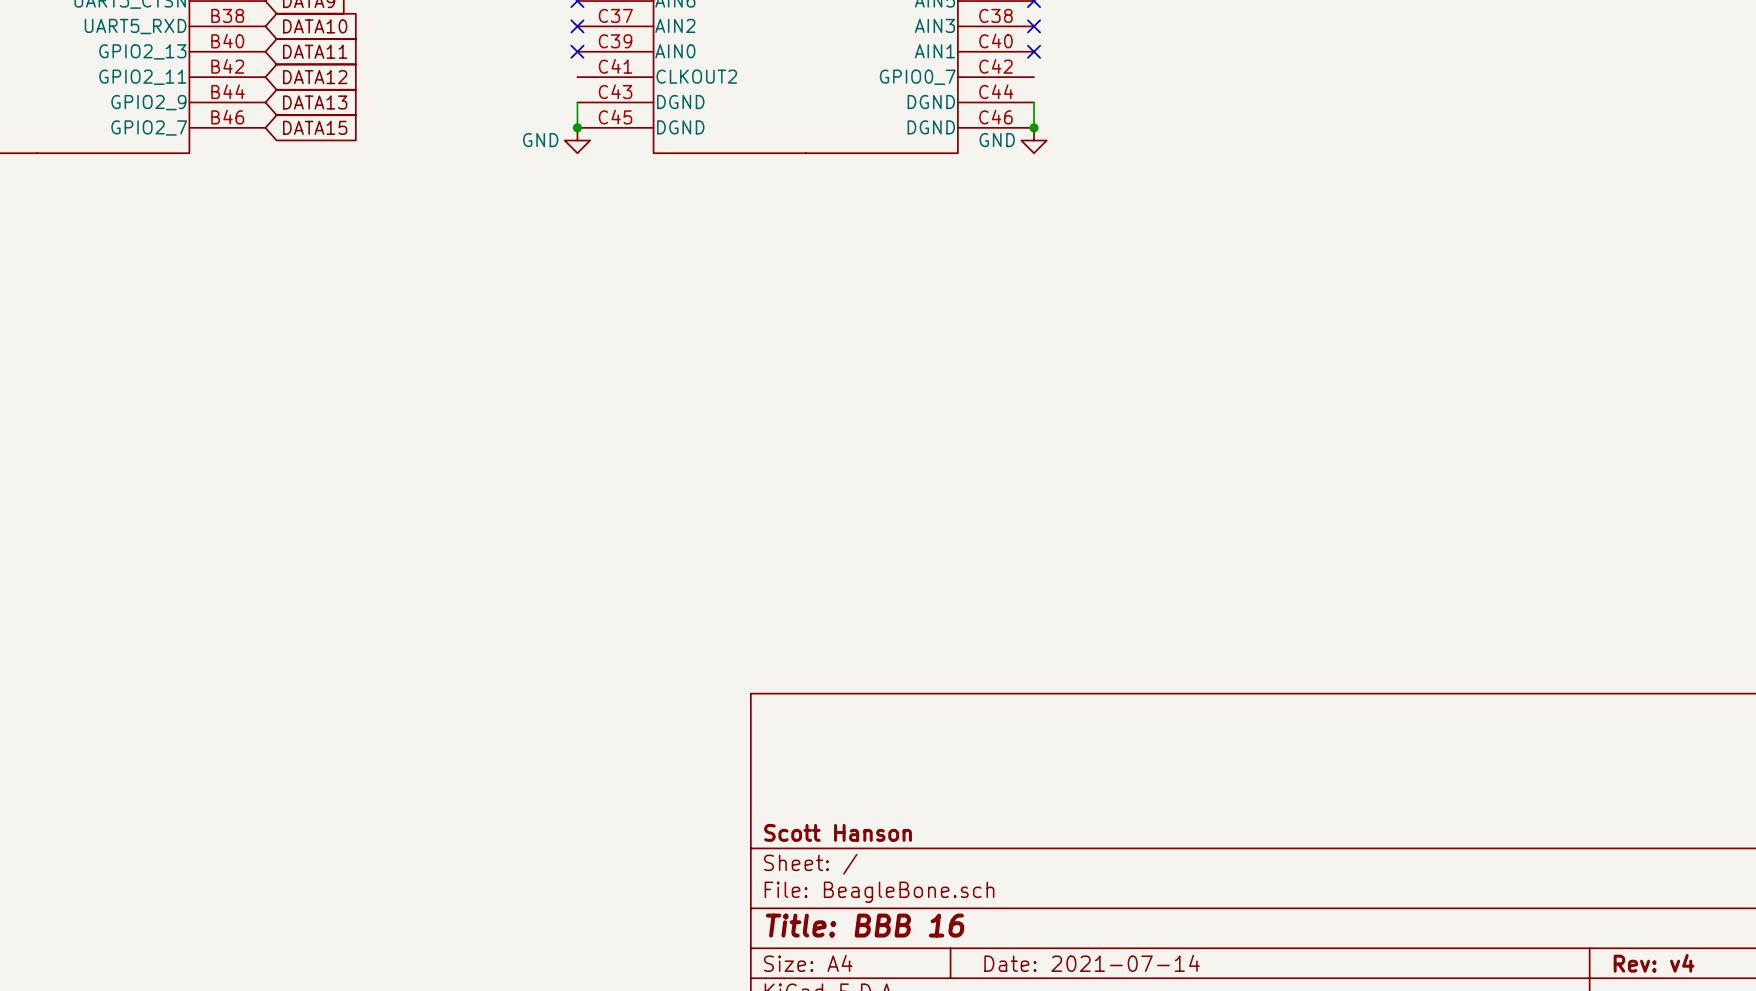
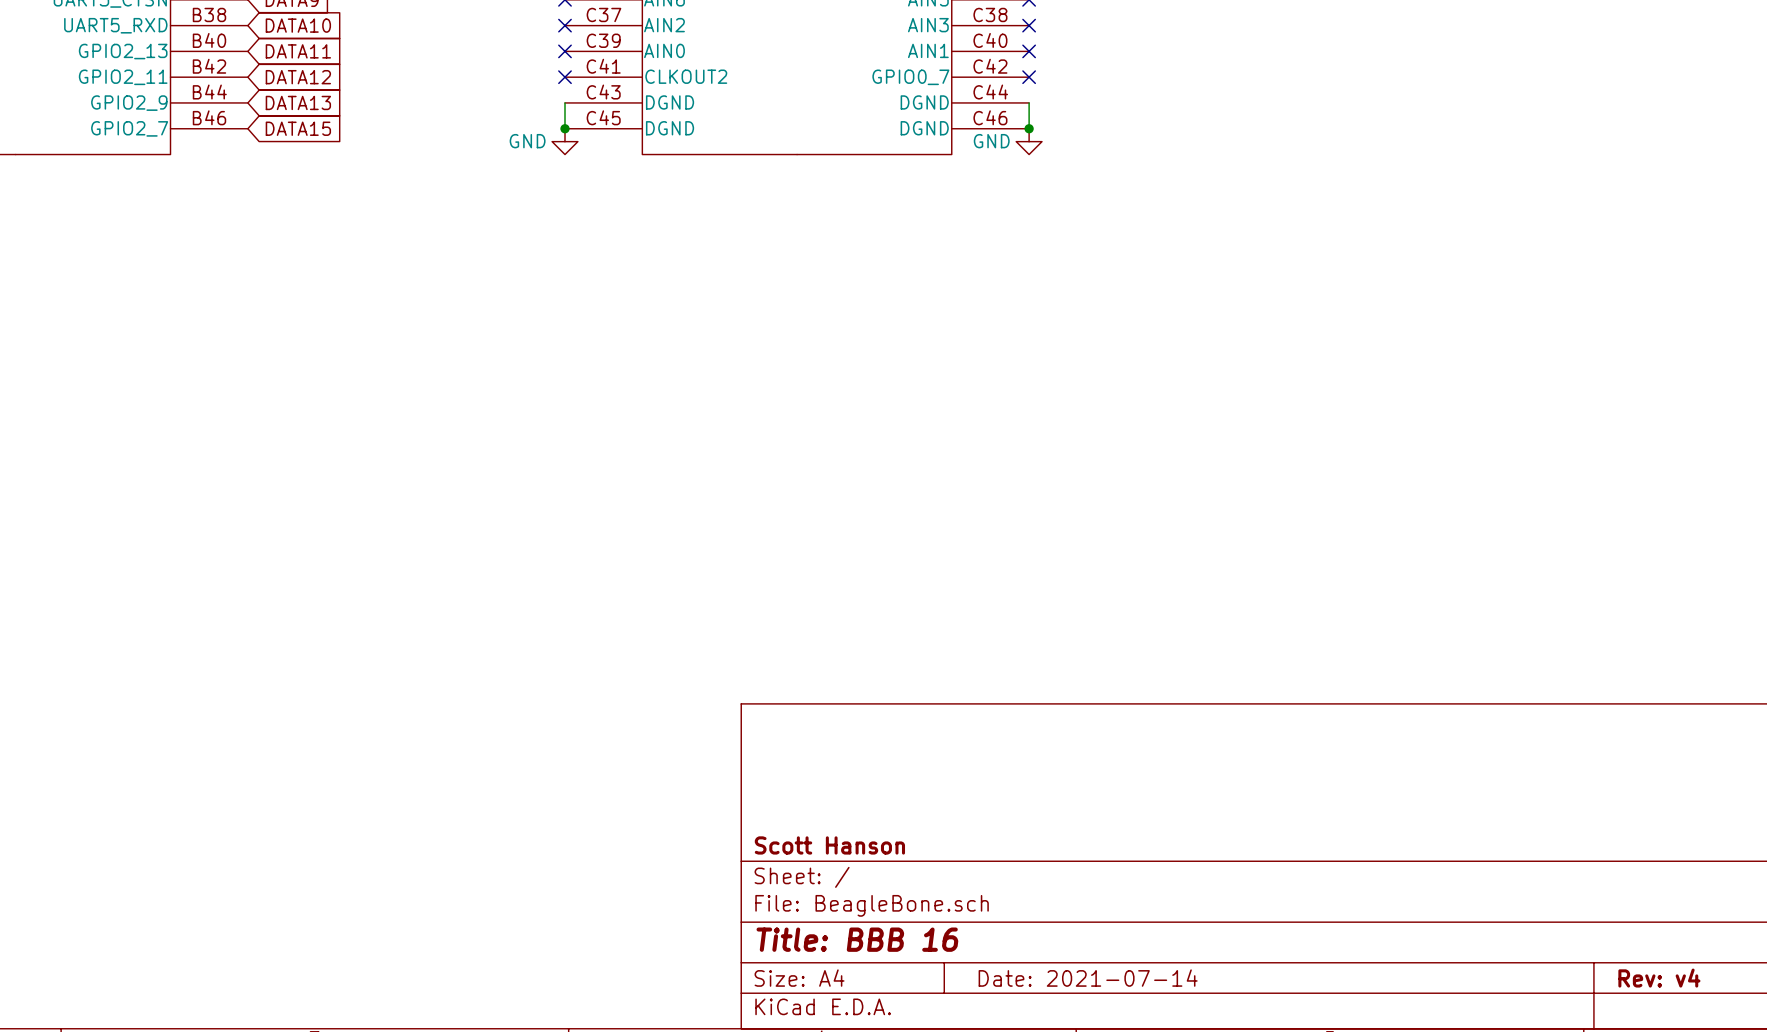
no-connect mark: none -> (564, 77)
no-connect mark: none -> (1029, 77)

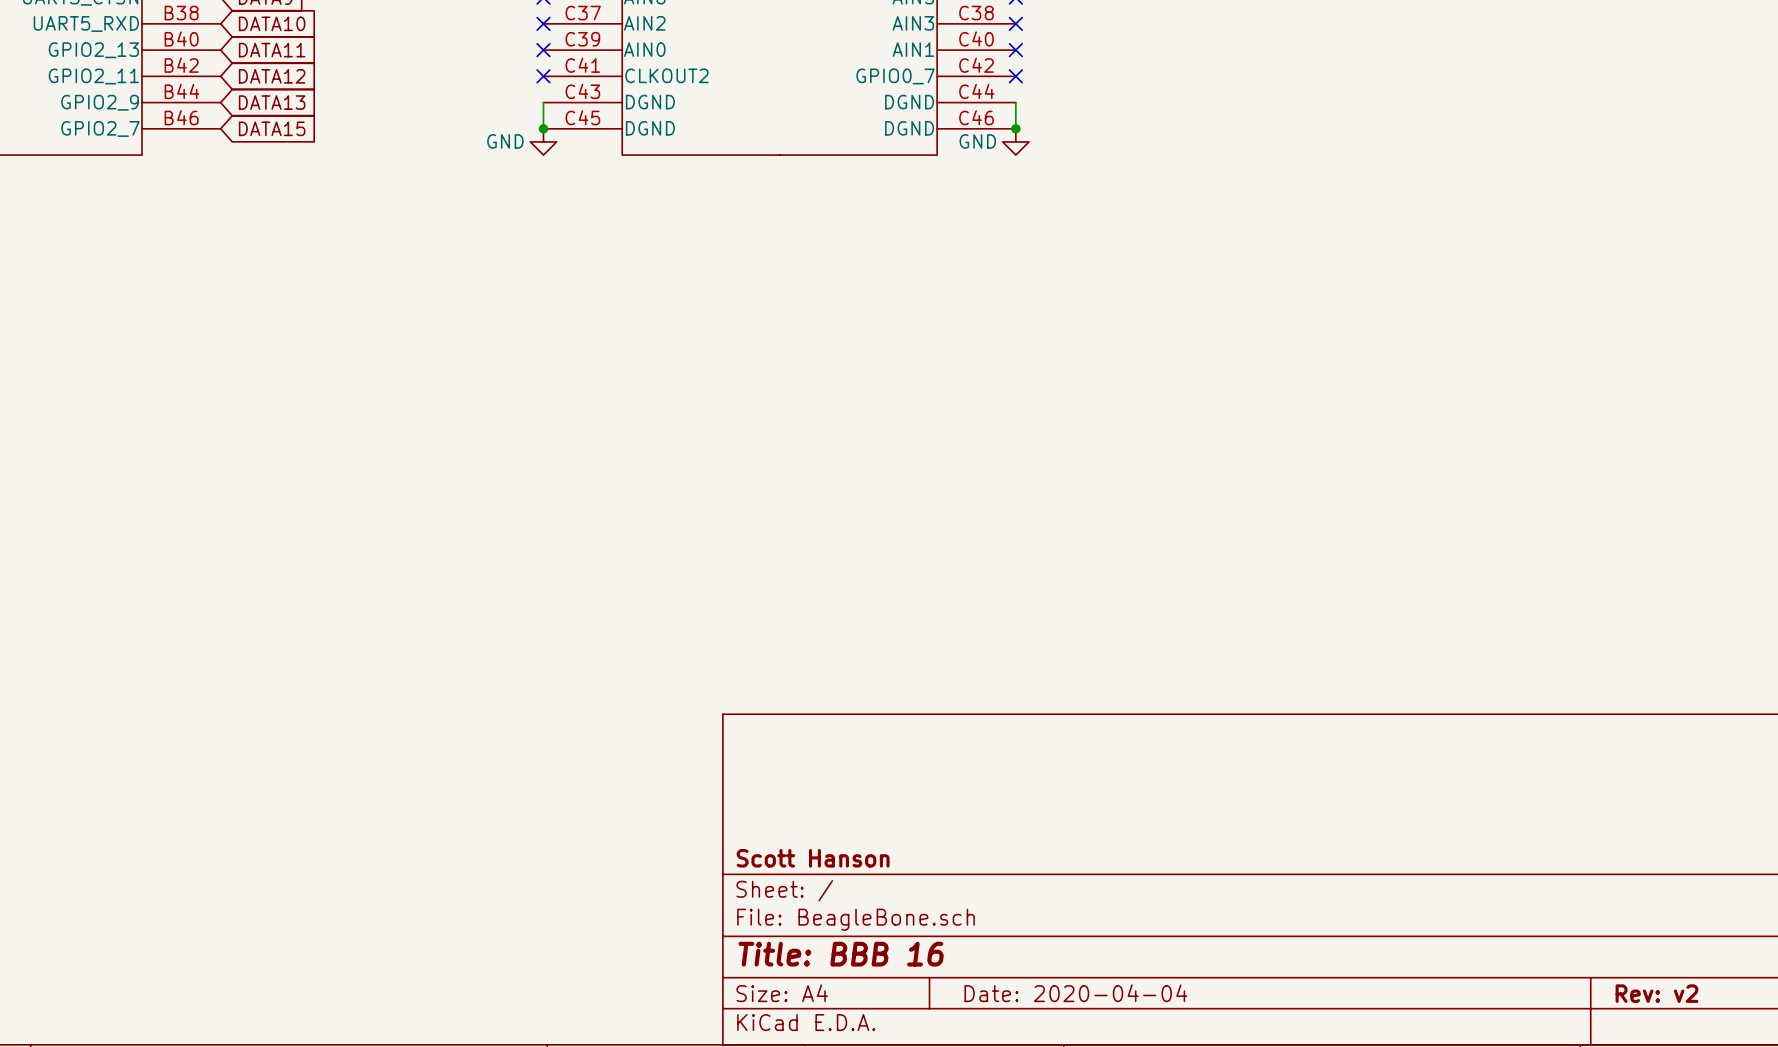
title block: Date: 2021-07-14 (1088, 978) -> Date: 2020-04-04 (1075, 993)
title block: Rev: v4 (1659, 978) -> Rev: v2 (1656, 993)

